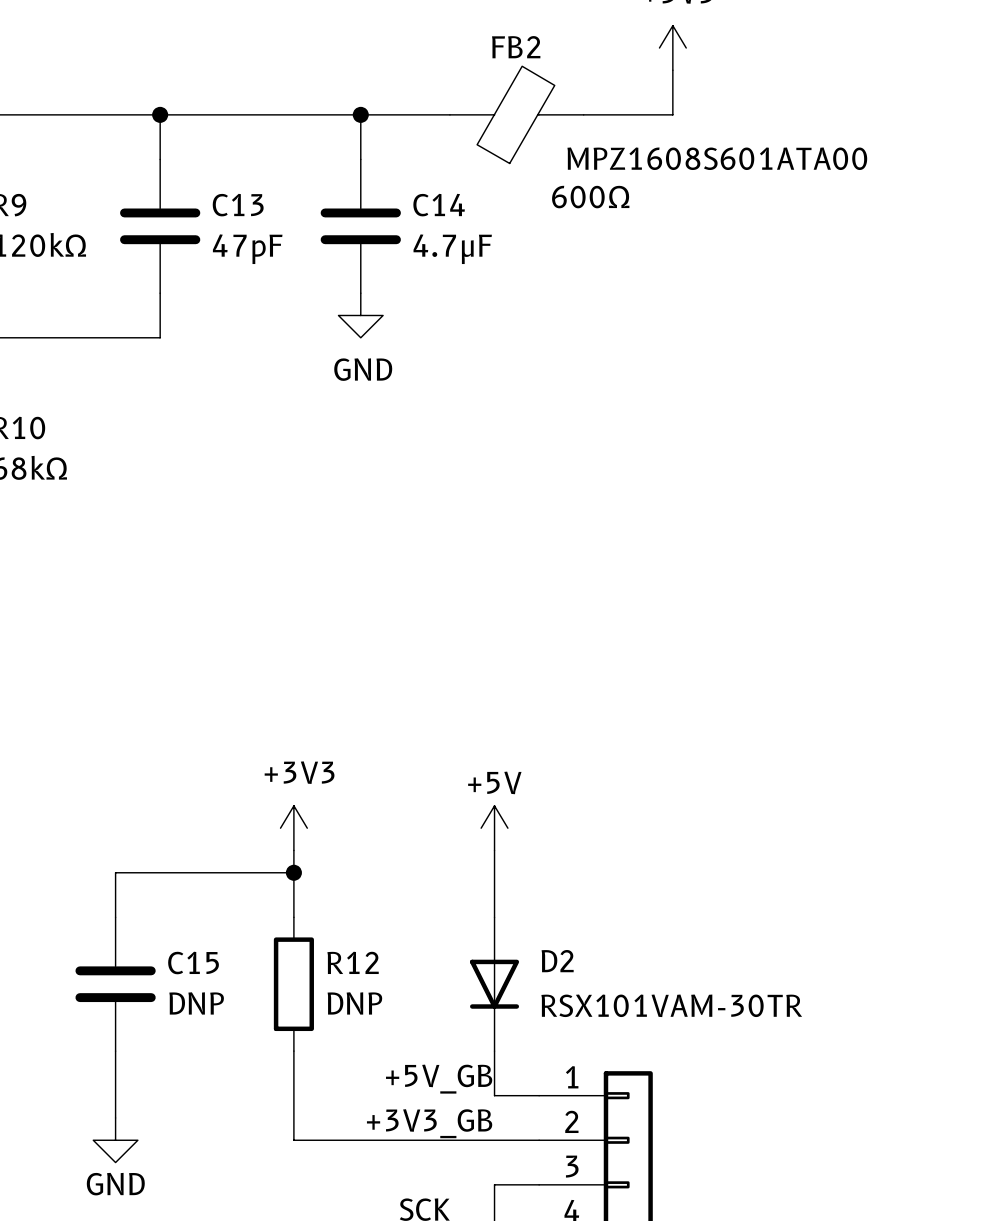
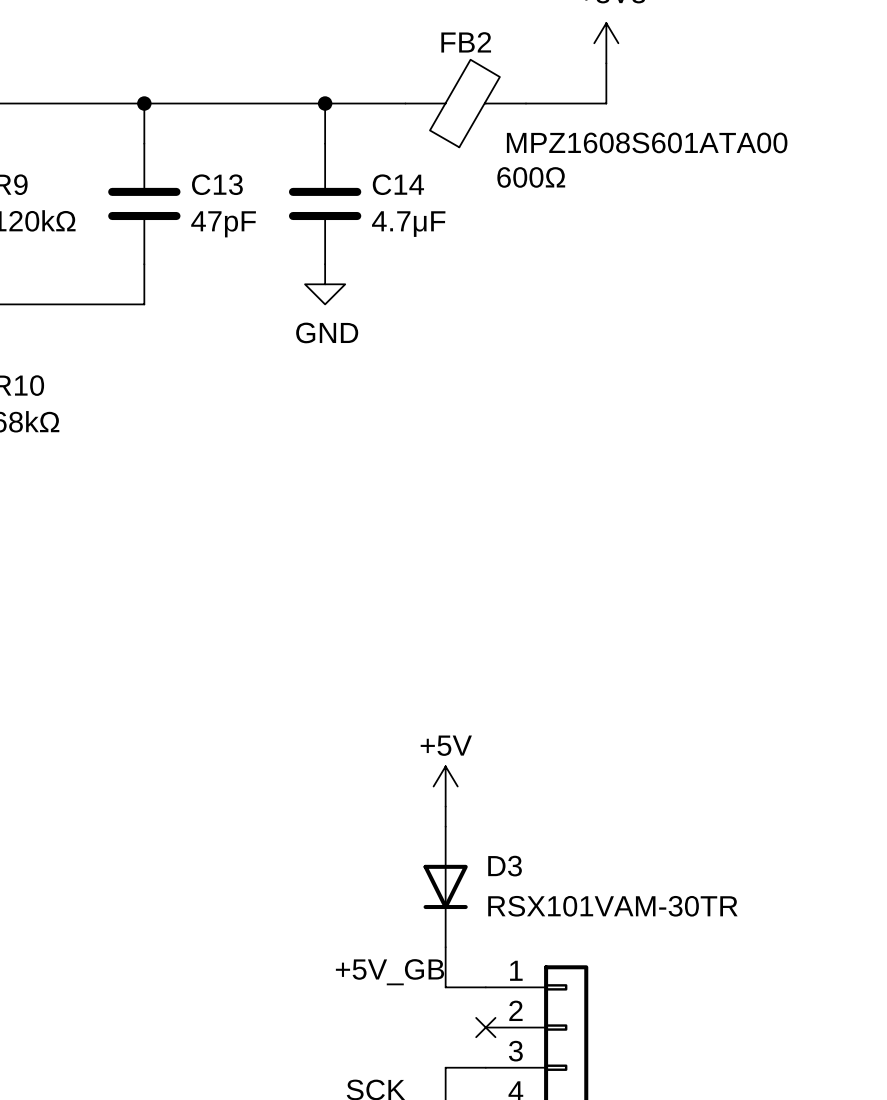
power symbol: +3V3 (293, 828) -> none
power symbol position: +5V (494, 828) -> +5V (445, 786)
wire: (293, 850) (293, 917) -> none
wire: (293, 872) (115, 872) (115, 917) -> none
junction: (293, 872) -> none
D2 name: D2 (557, 961) -> D3 (505, 866)
C15: DNP (115, 984) -> none
R12: DNP (293, 984) -> none
wire: (115, 1051) (115, 1117) -> none
wire: (293, 1051) (293, 1140) (539, 1140) -> none
label: +3V3_GB (429, 1123) -> none
power symbol: GND (115, 1140) -> none
no-connect mark: none -> (485, 1027)

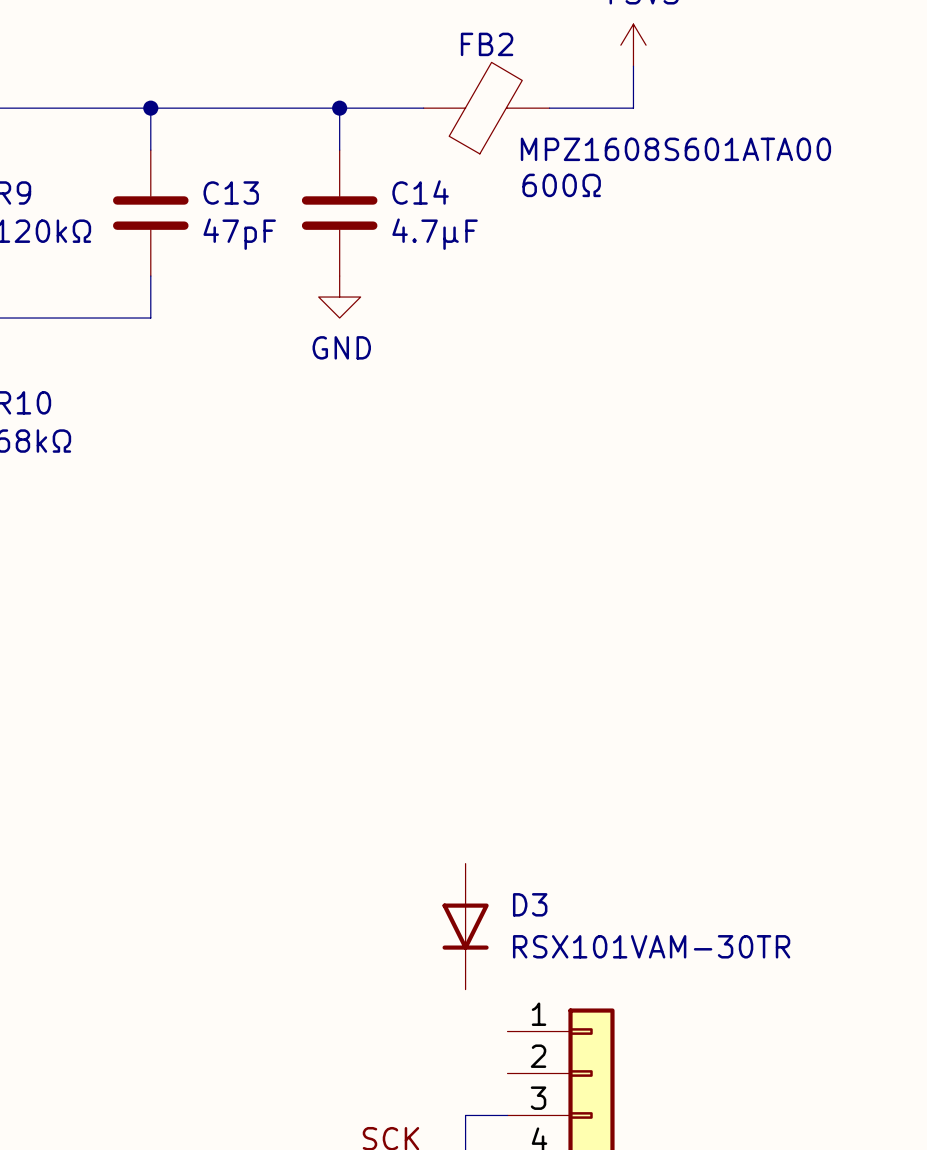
power symbol: +5V (445, 786) -> none
wire: (445, 806) (445, 826) -> none
wire: (445, 947) (445, 987) (485, 987) -> none
label: +5V_GB (390, 972) -> none
no-connect mark: (485, 1027) -> none

